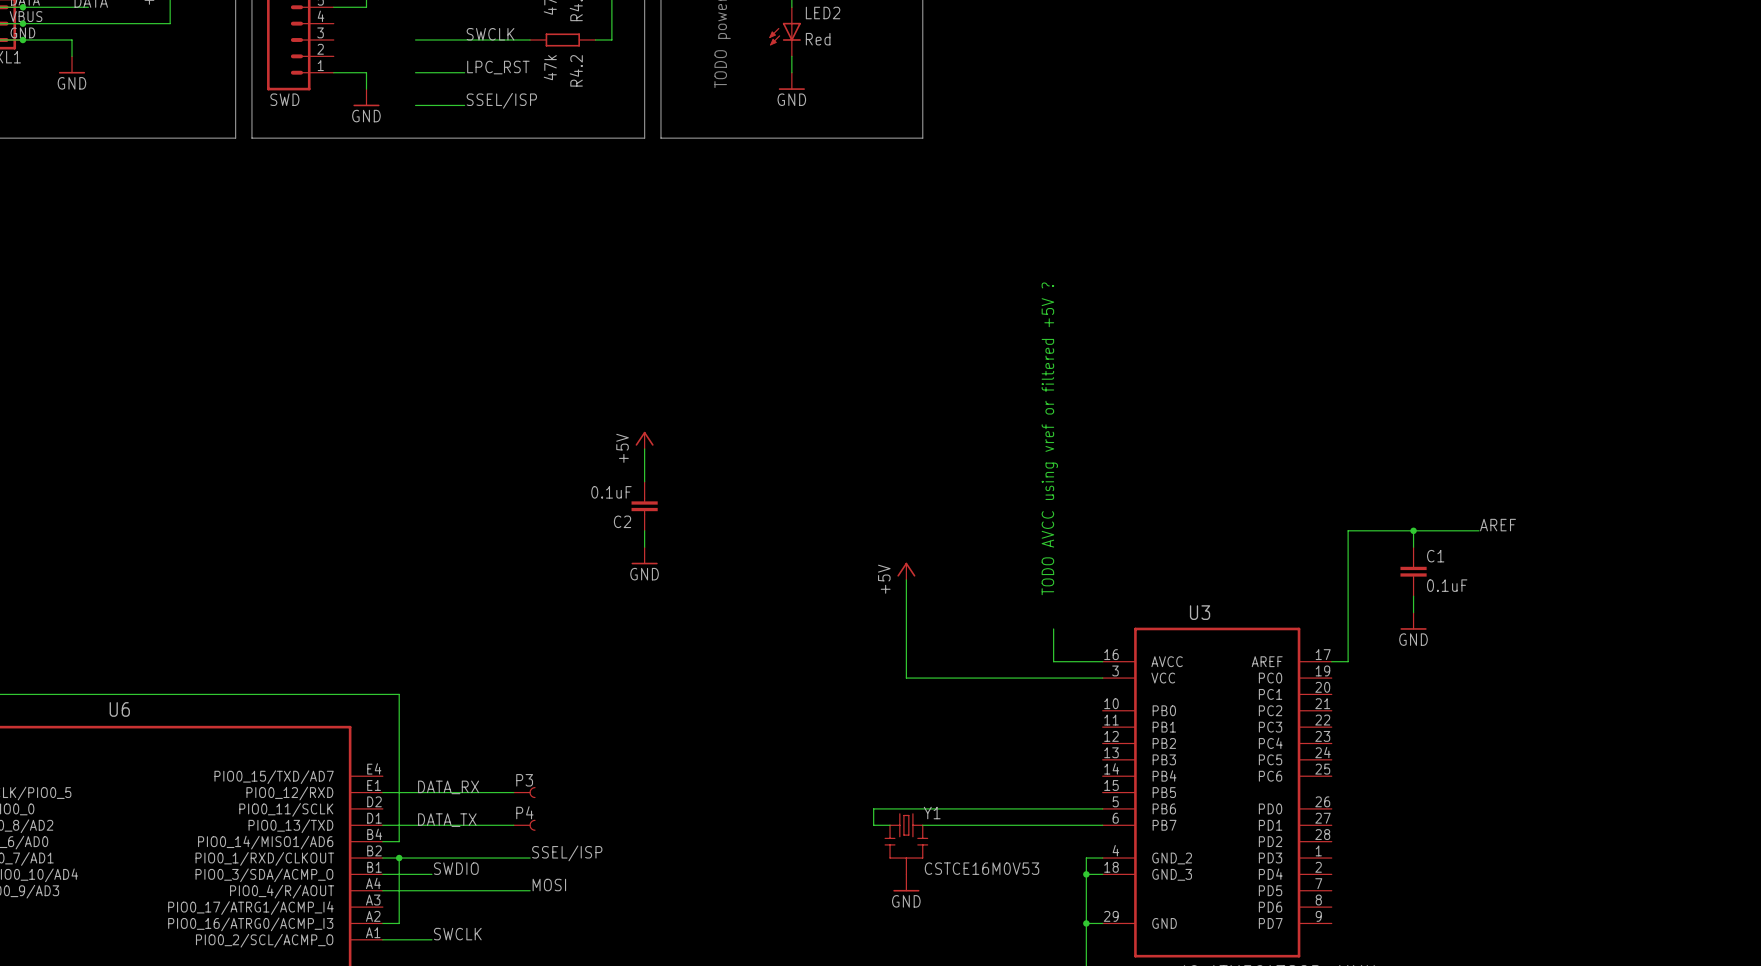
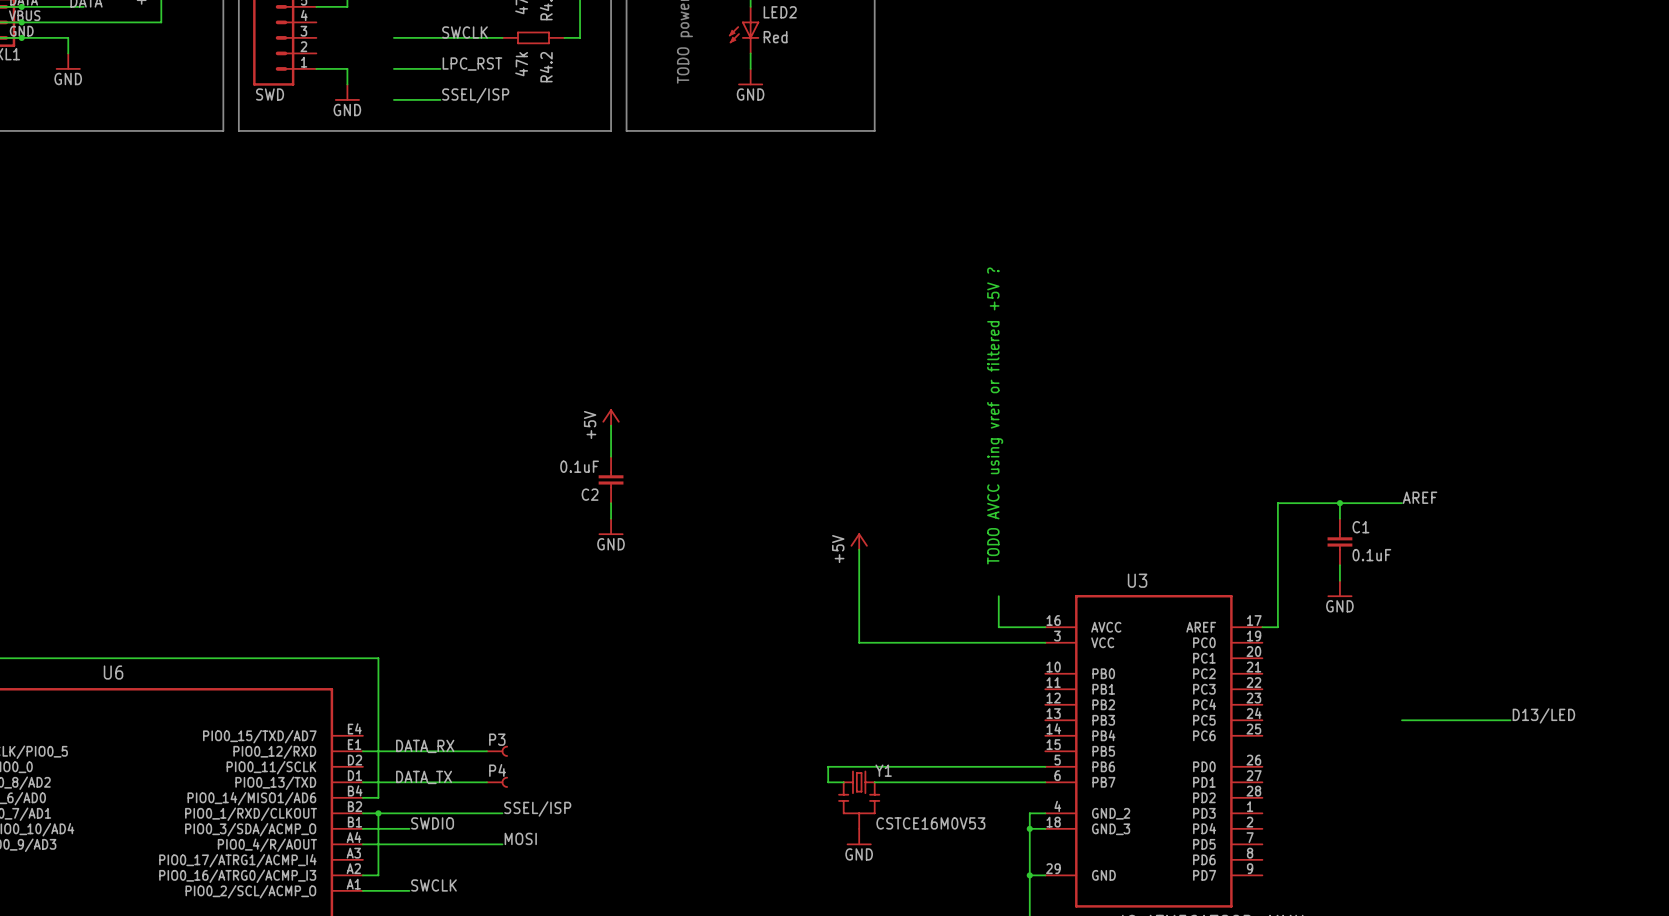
label: none -> D13/LED (1543, 715)
wire: none -> (1401, 720) (1510, 720)

